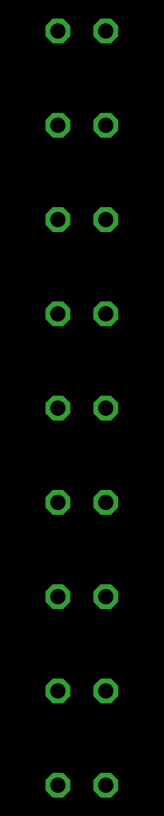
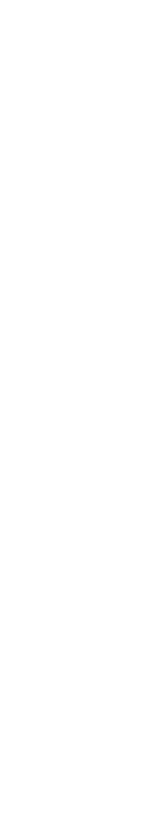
part: (81, 31) -> none
part: (81, 125) -> none
part: (81, 219) -> none
part: (81, 313) -> none
part: (81, 408) -> none
part: (81, 502) -> none
part: (81, 596) -> none
part: (81, 690) -> none
part: (81, 785) -> none

